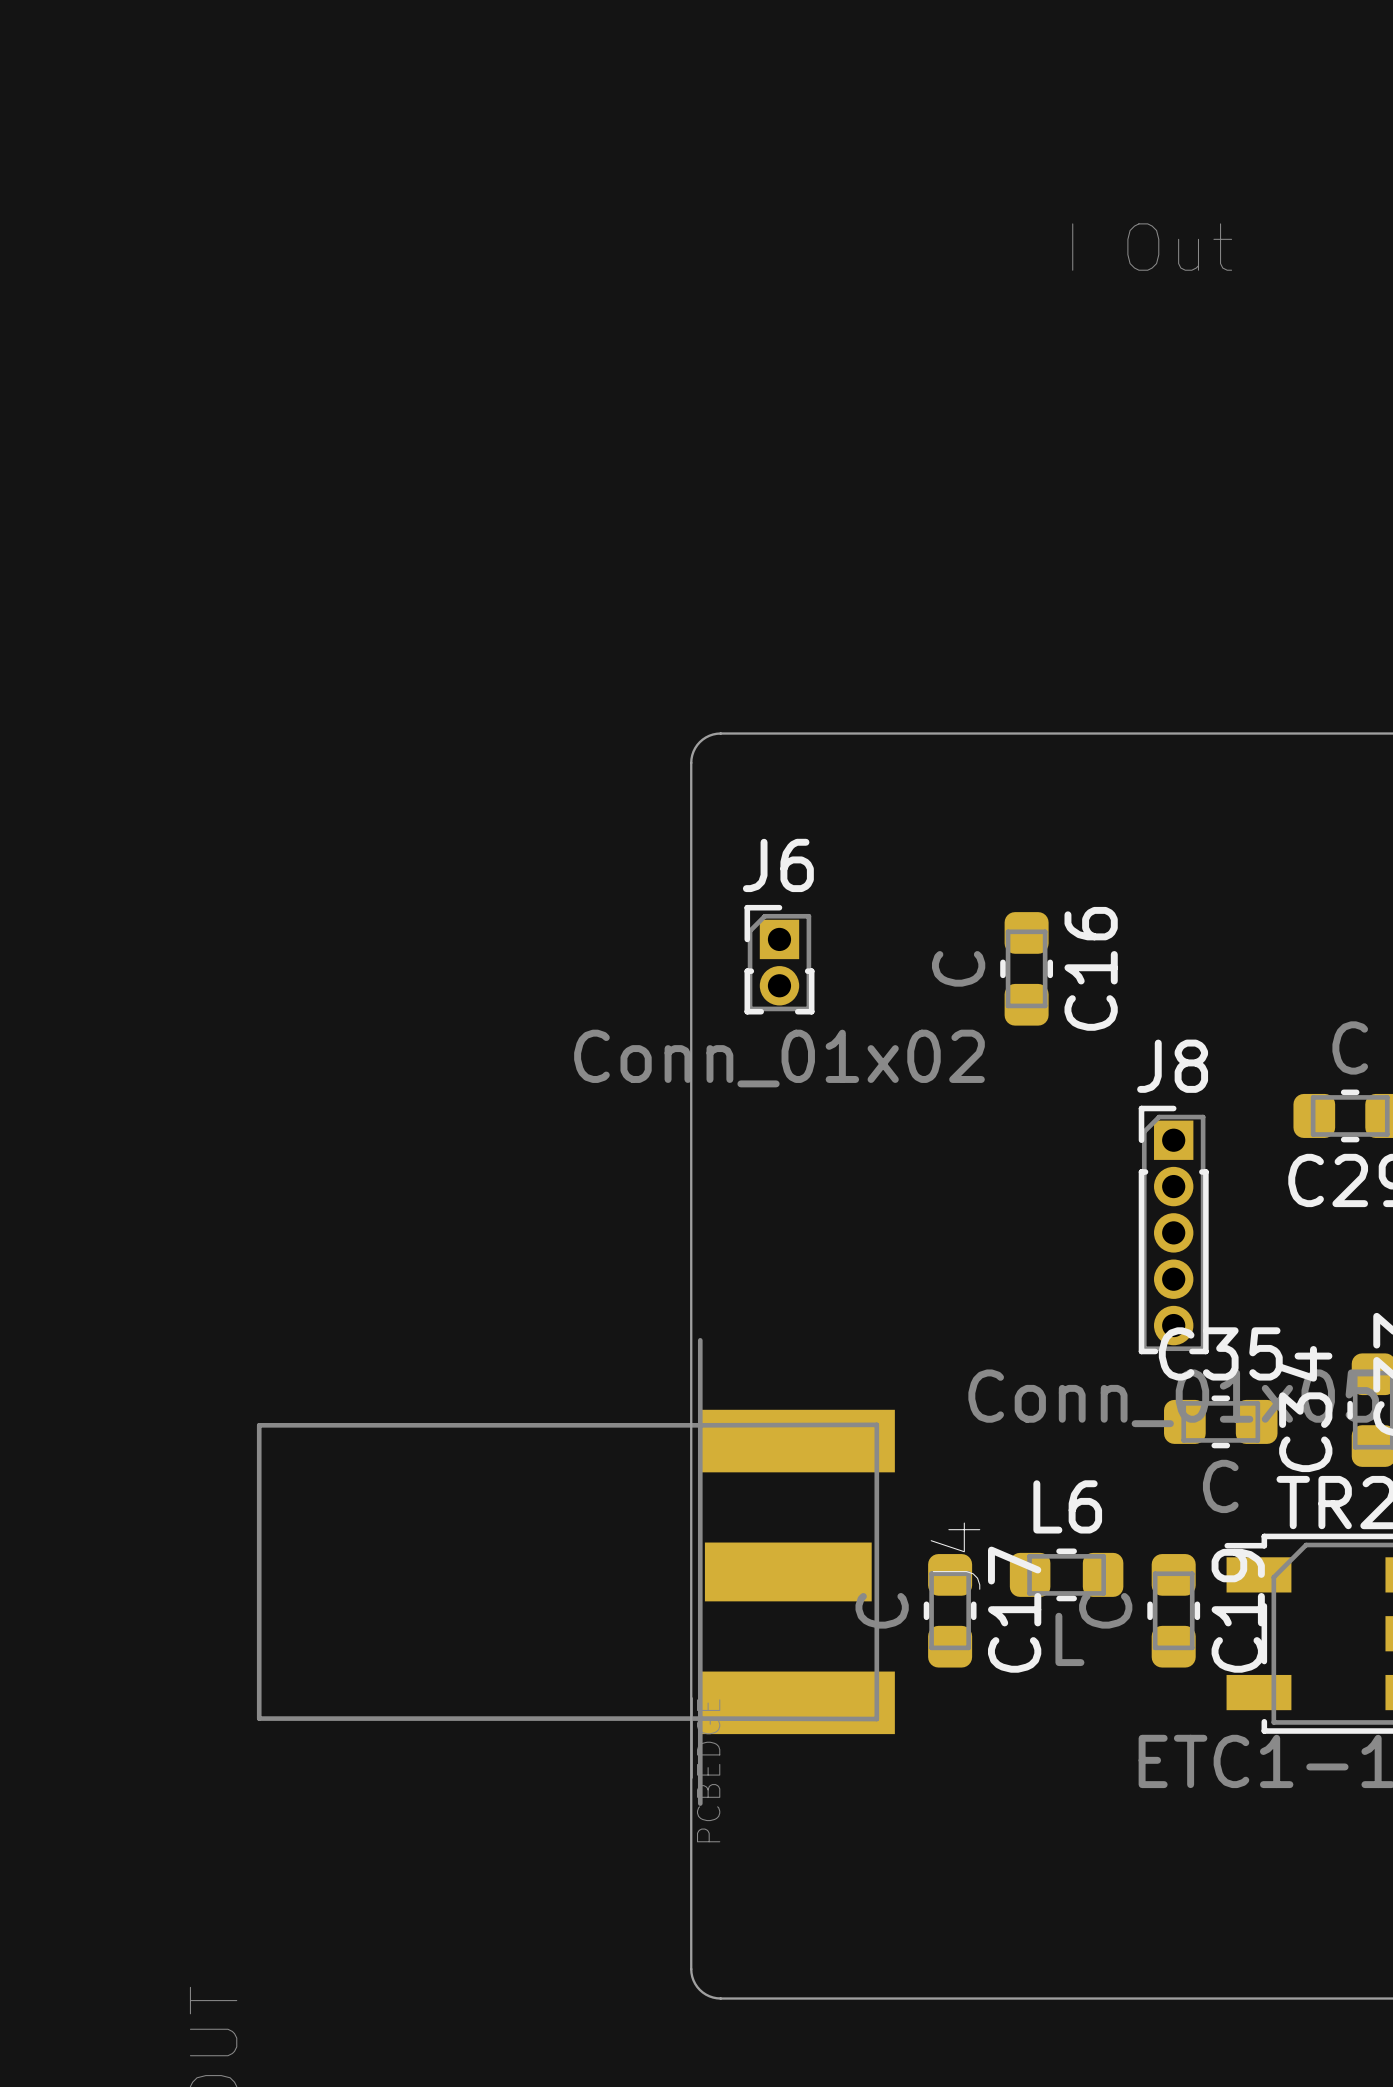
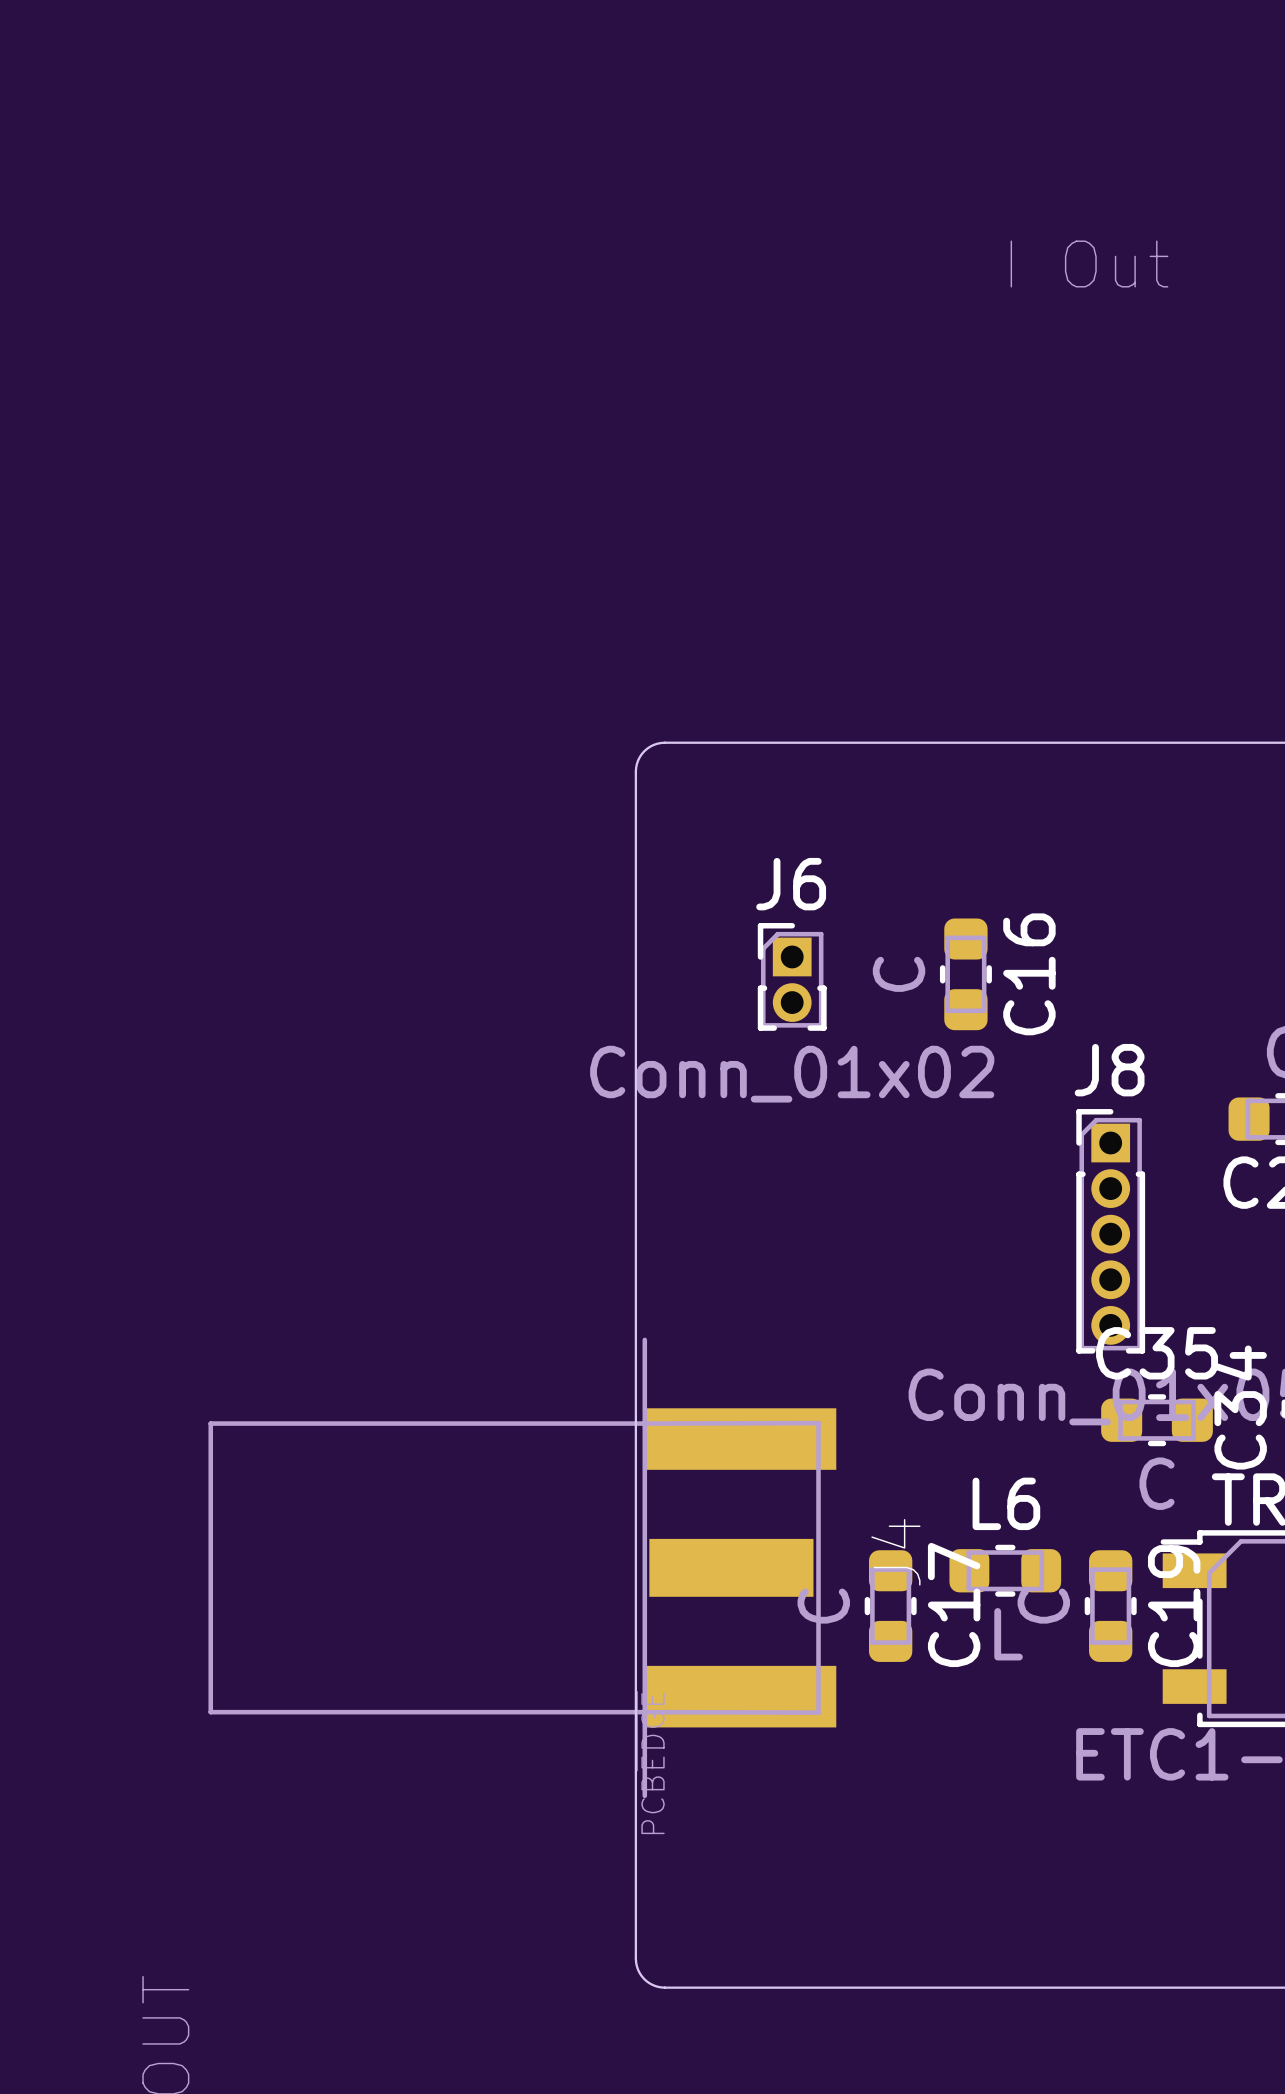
J6 position: (779, 959) -> (792, 976)

